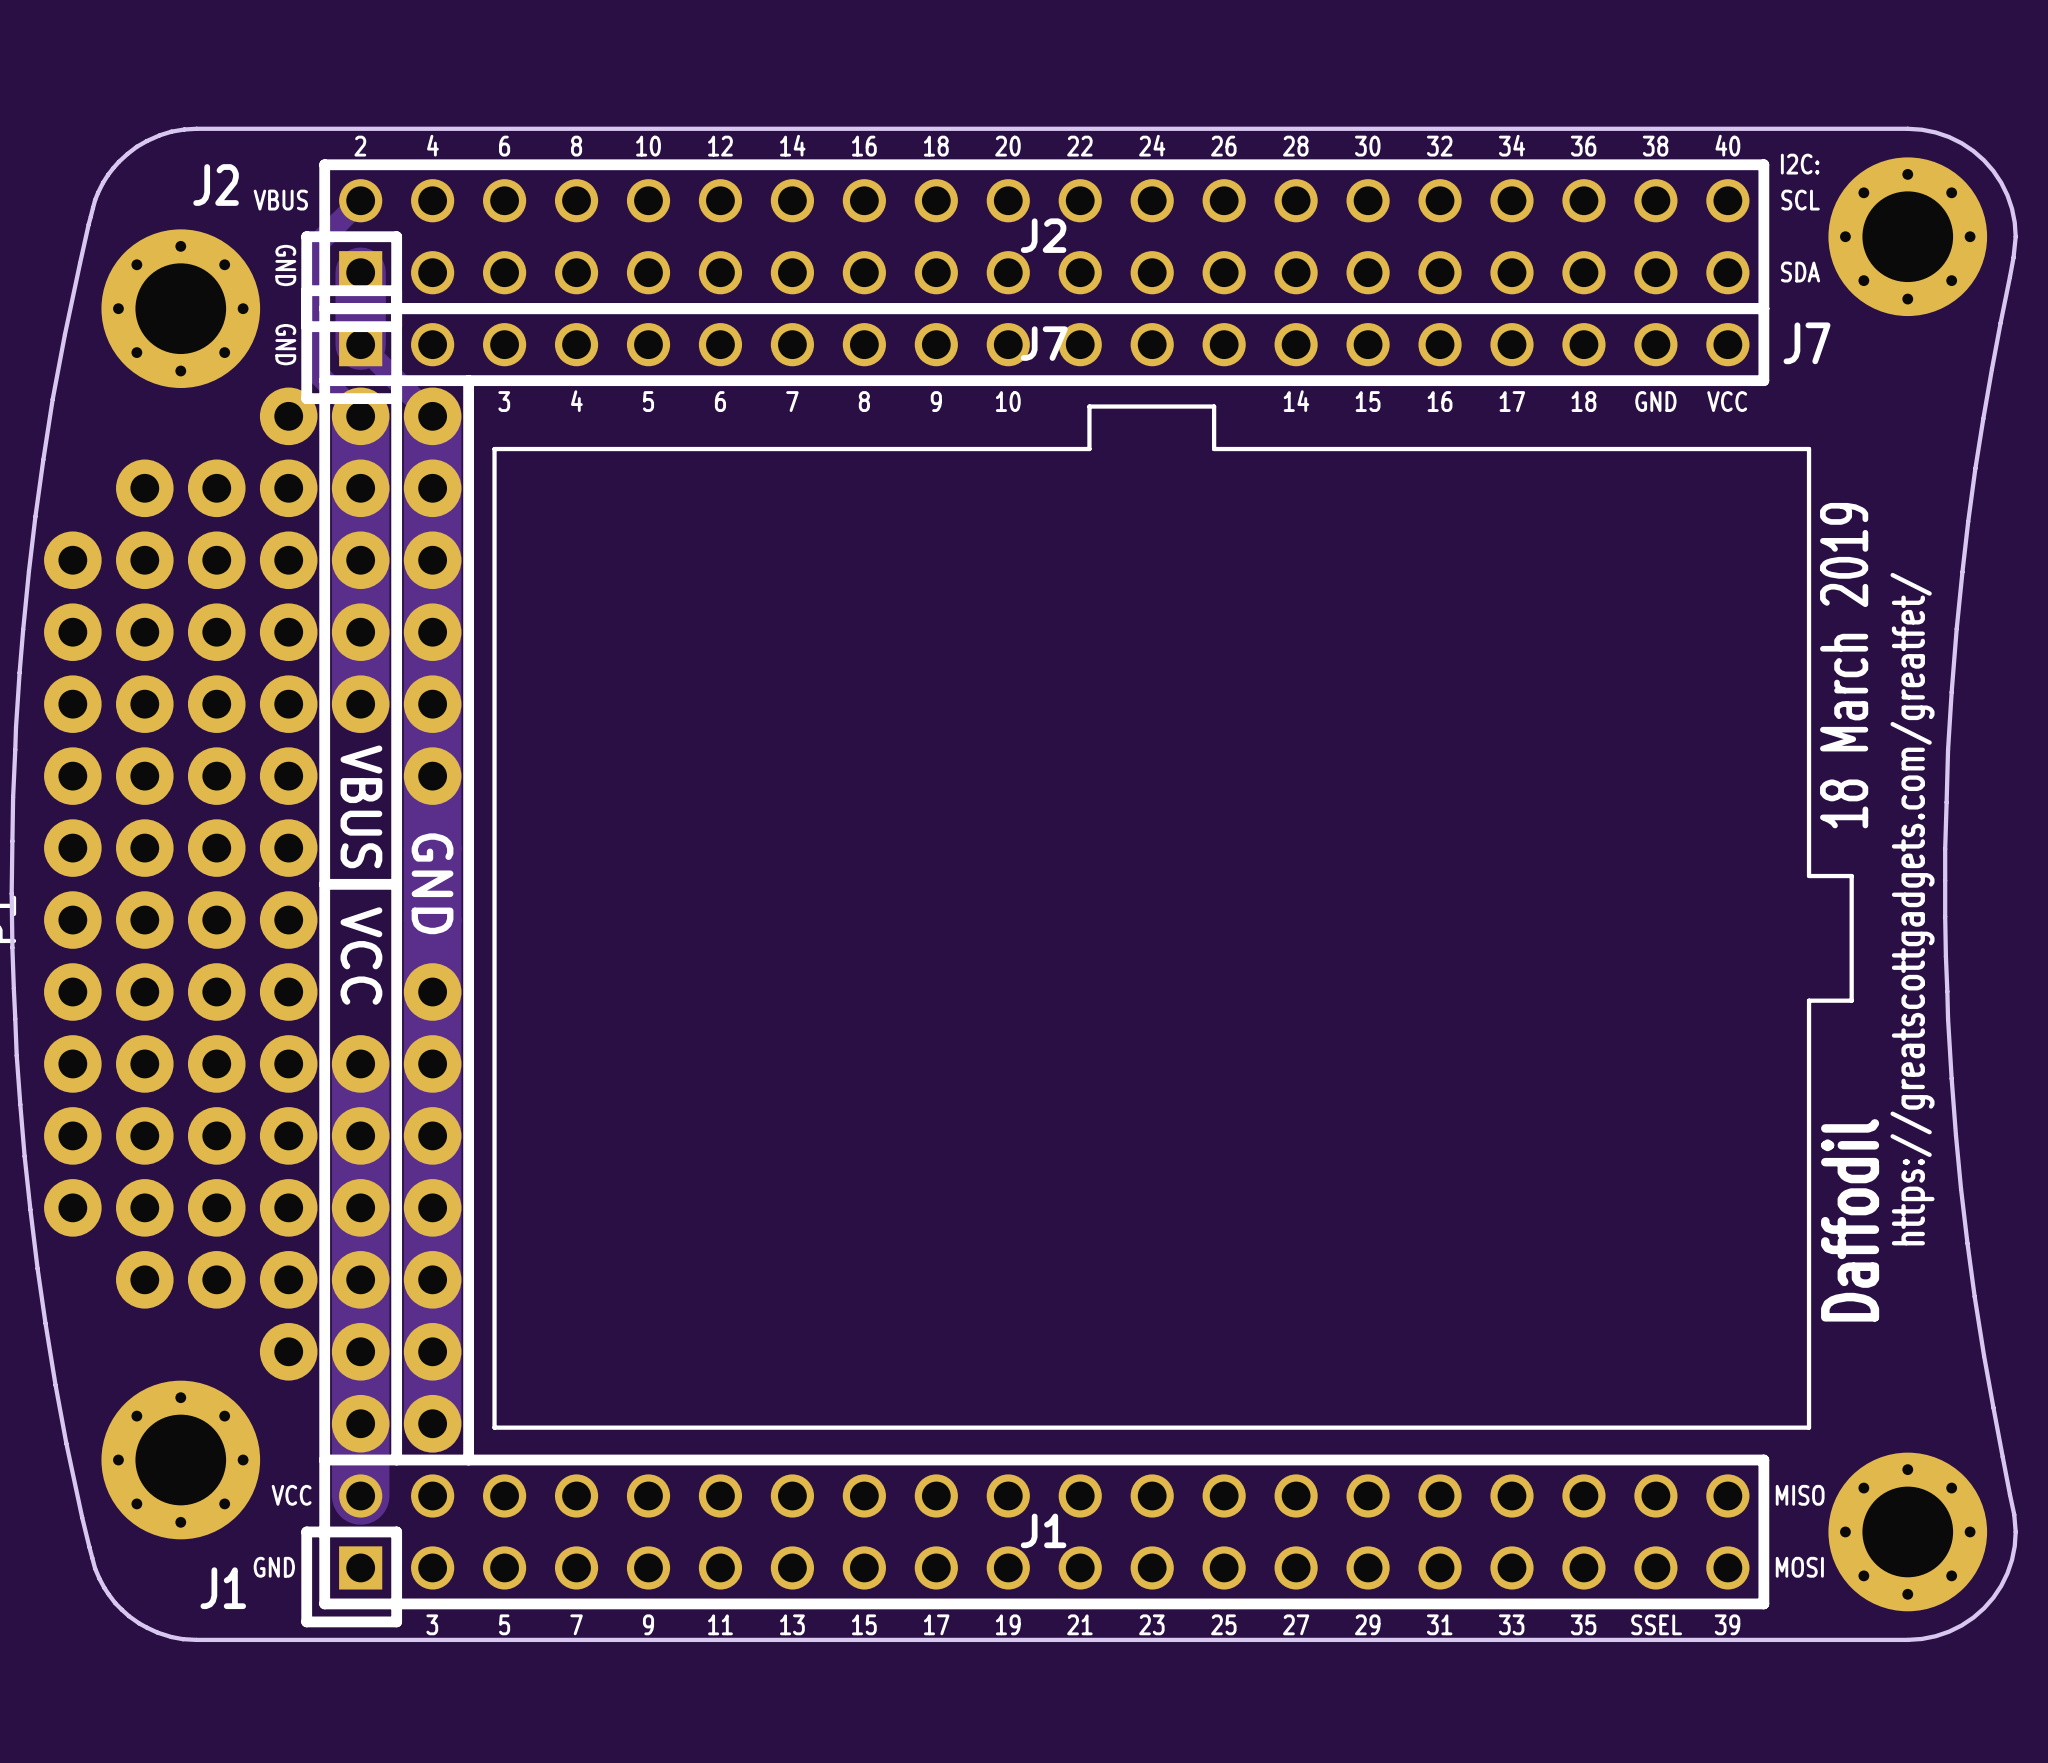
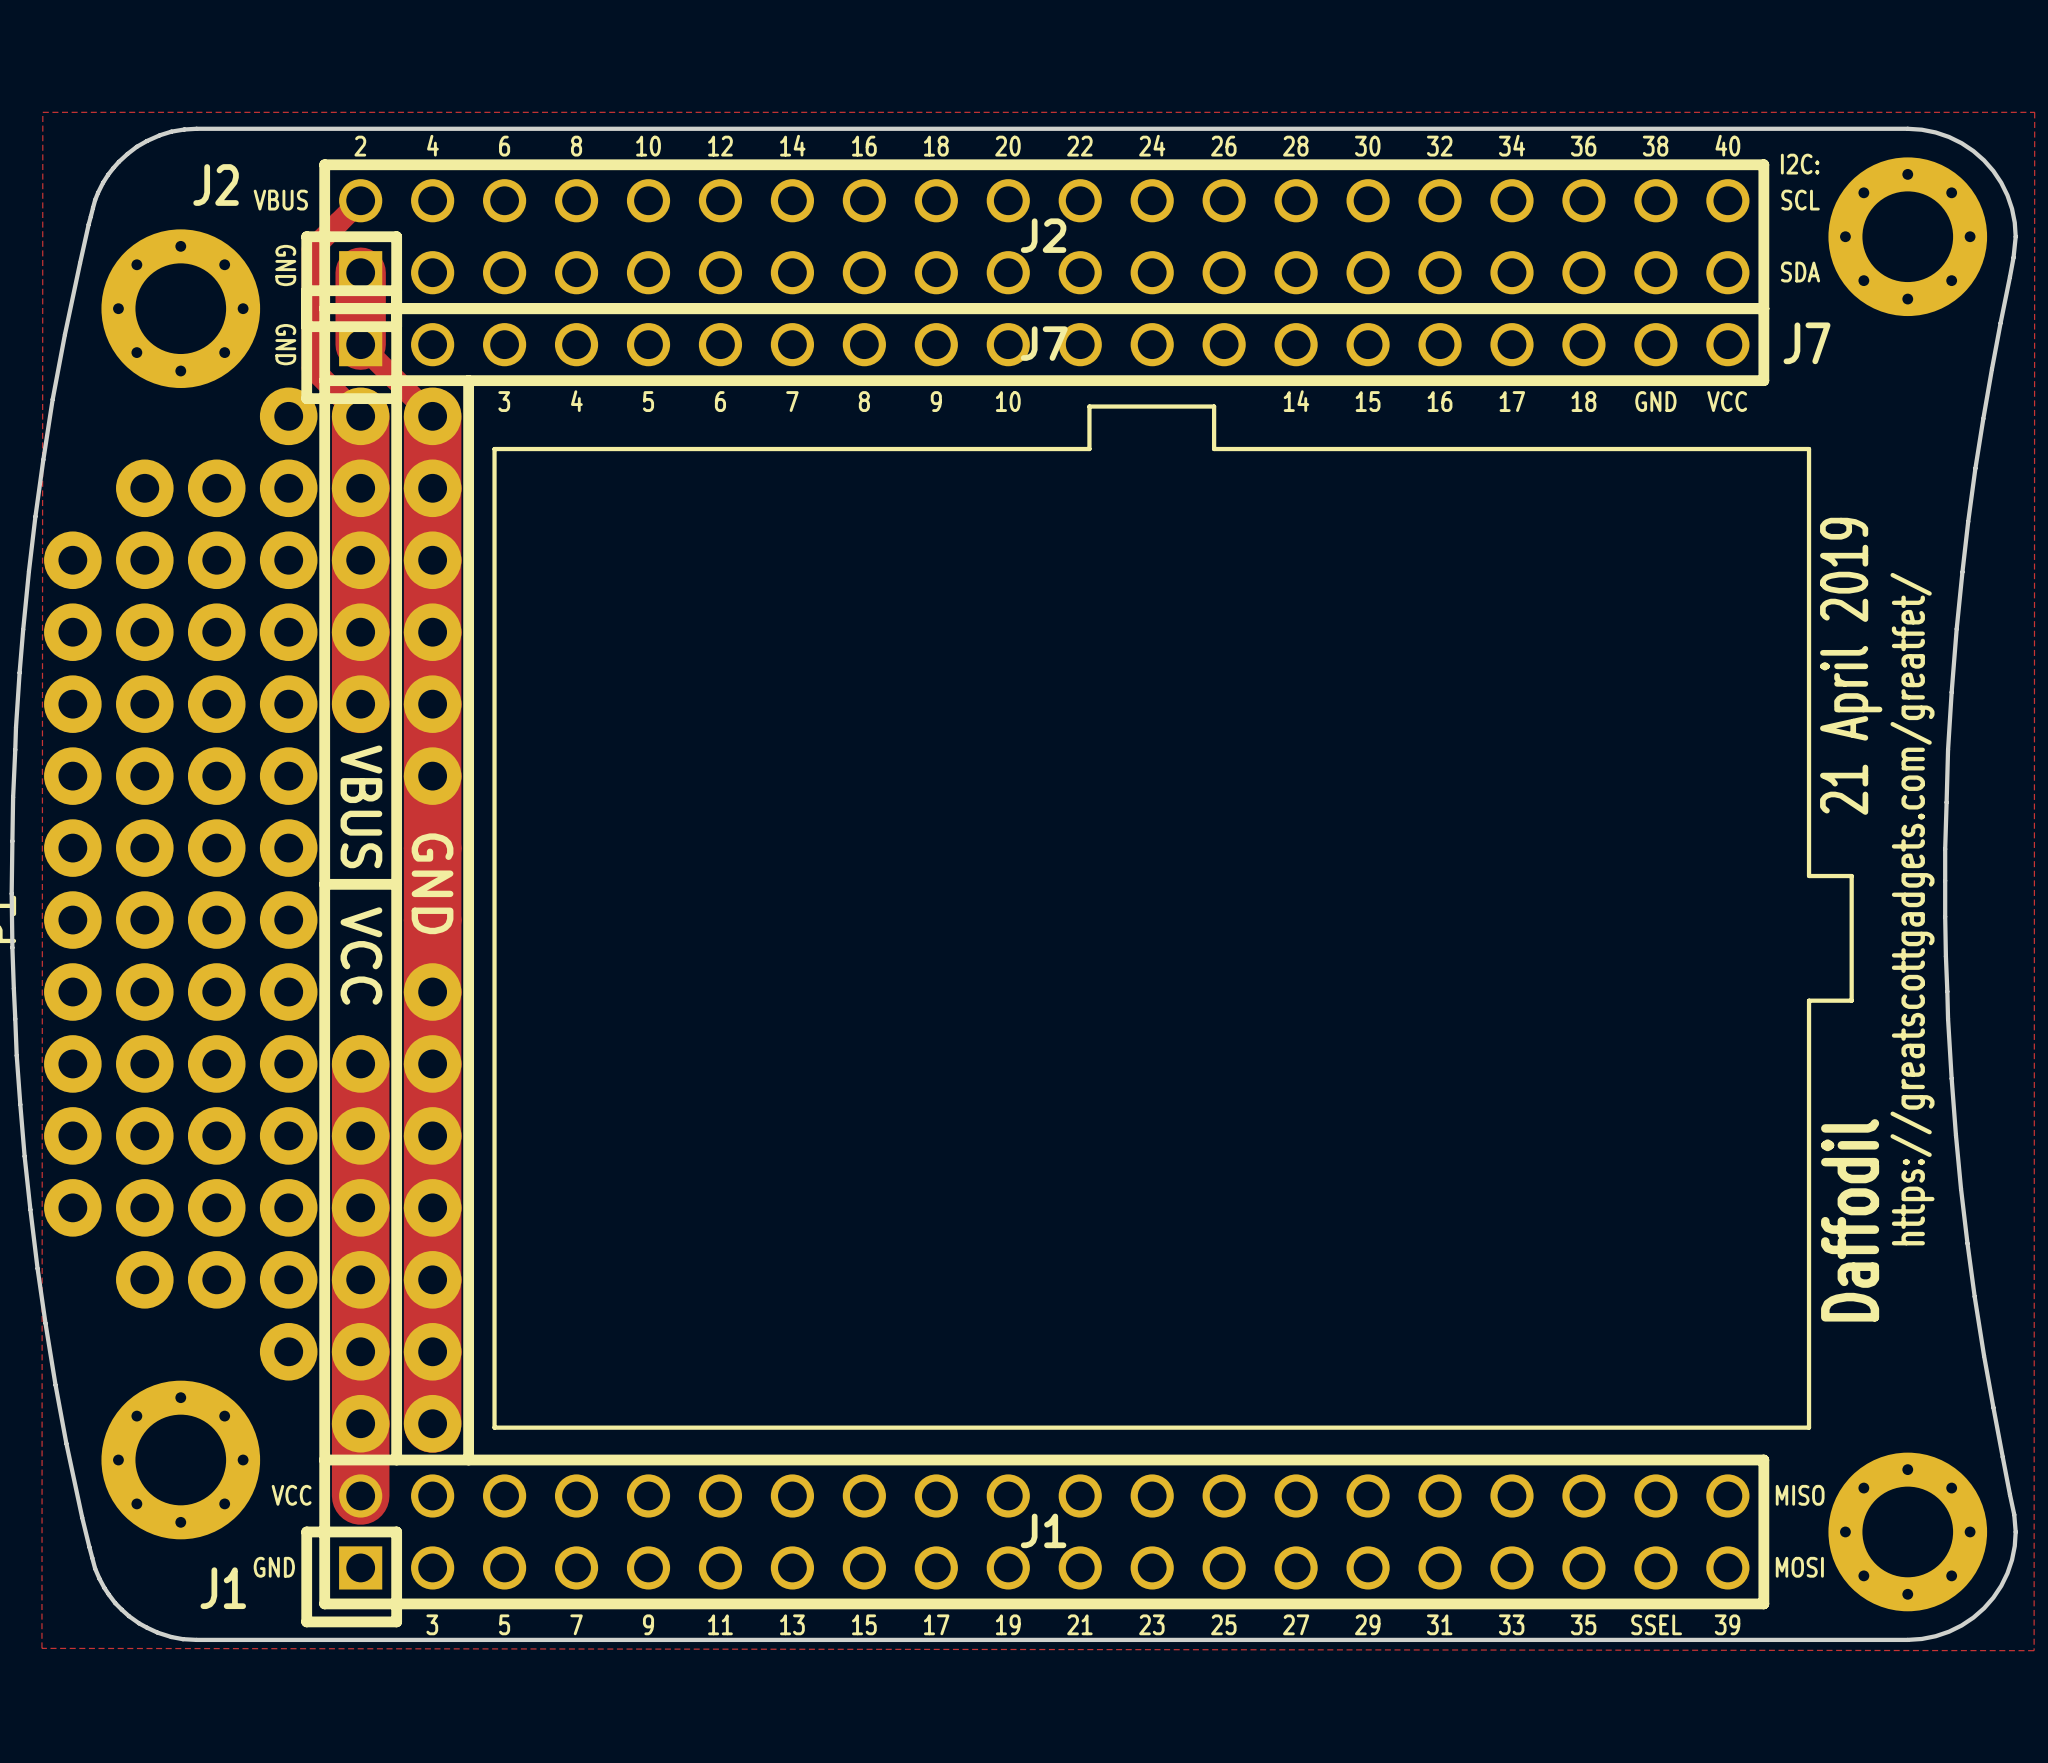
zone outline: none -> (42, 112) (2034, 112) (2034, 1650) (41, 1648) (42, 112)
text: 18 March 2019 (1844, 665) -> 21 April 2019 (1851, 666)

